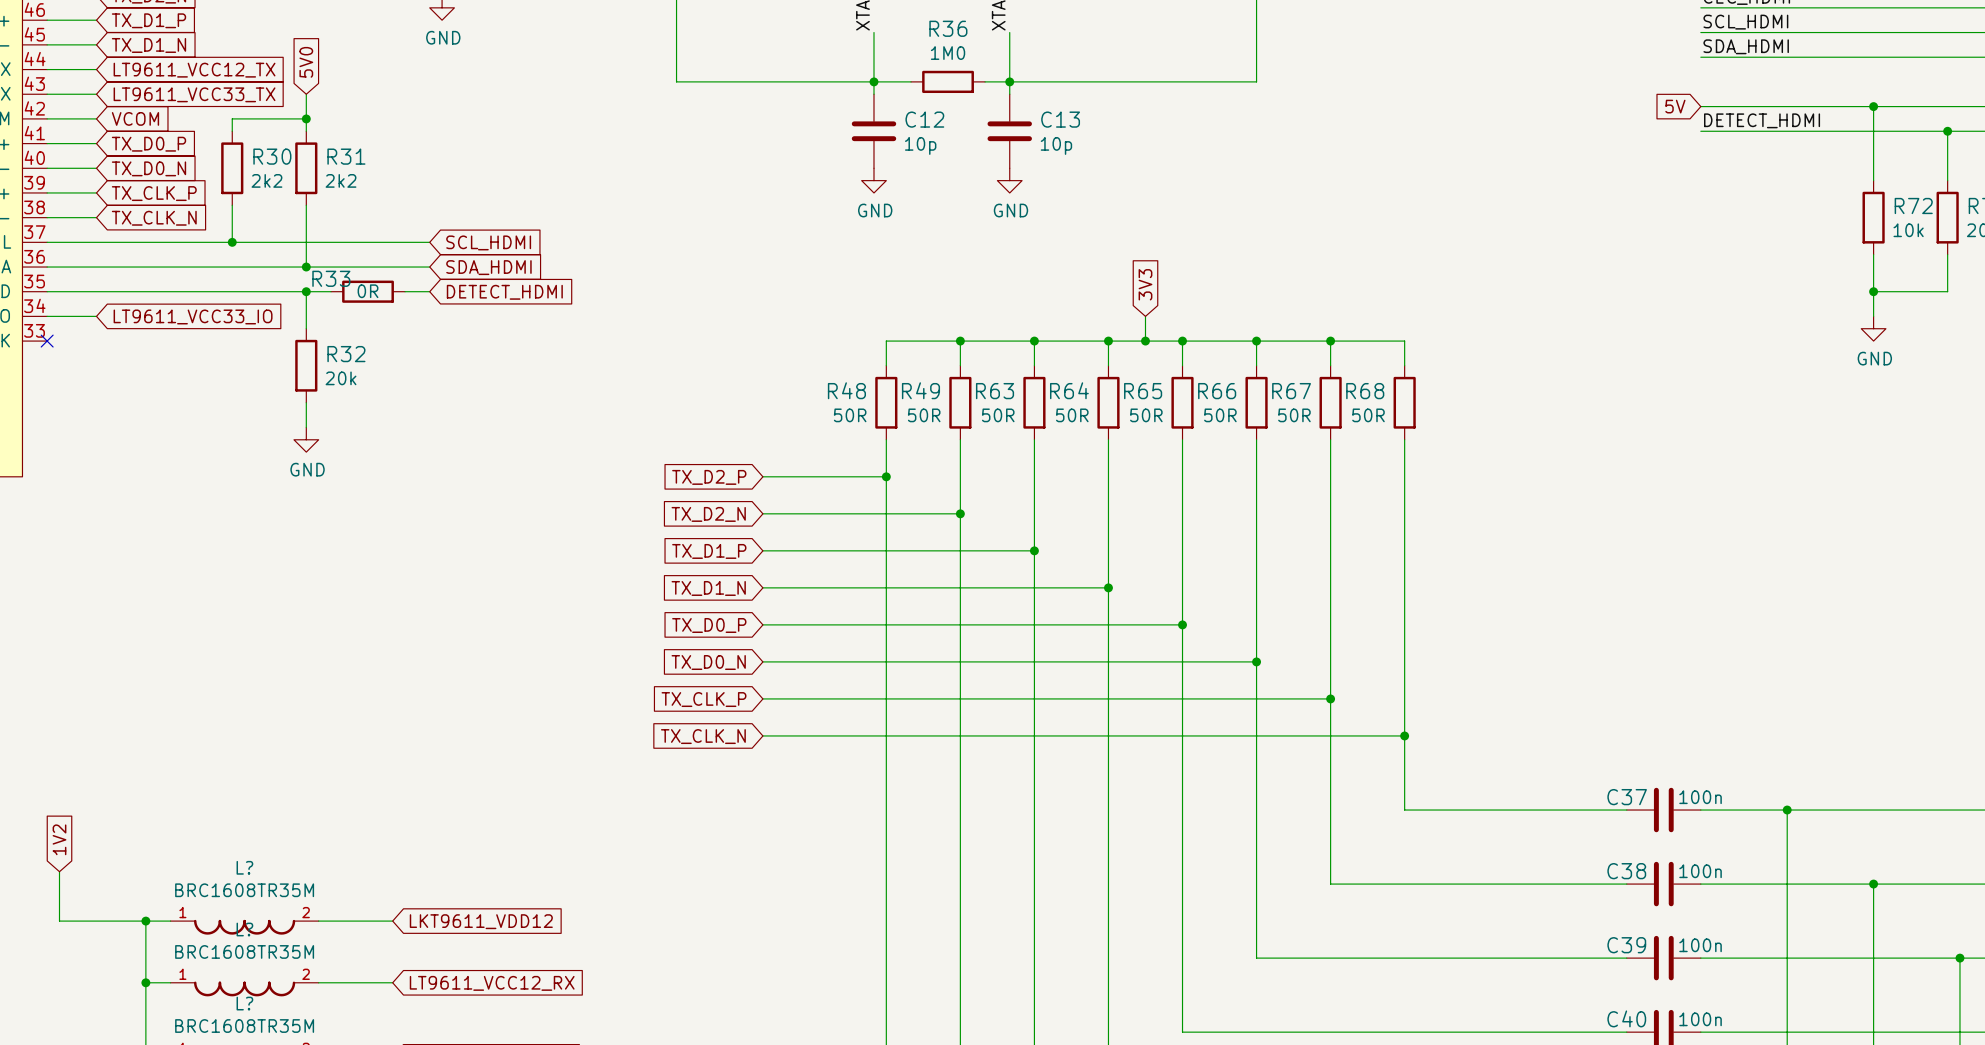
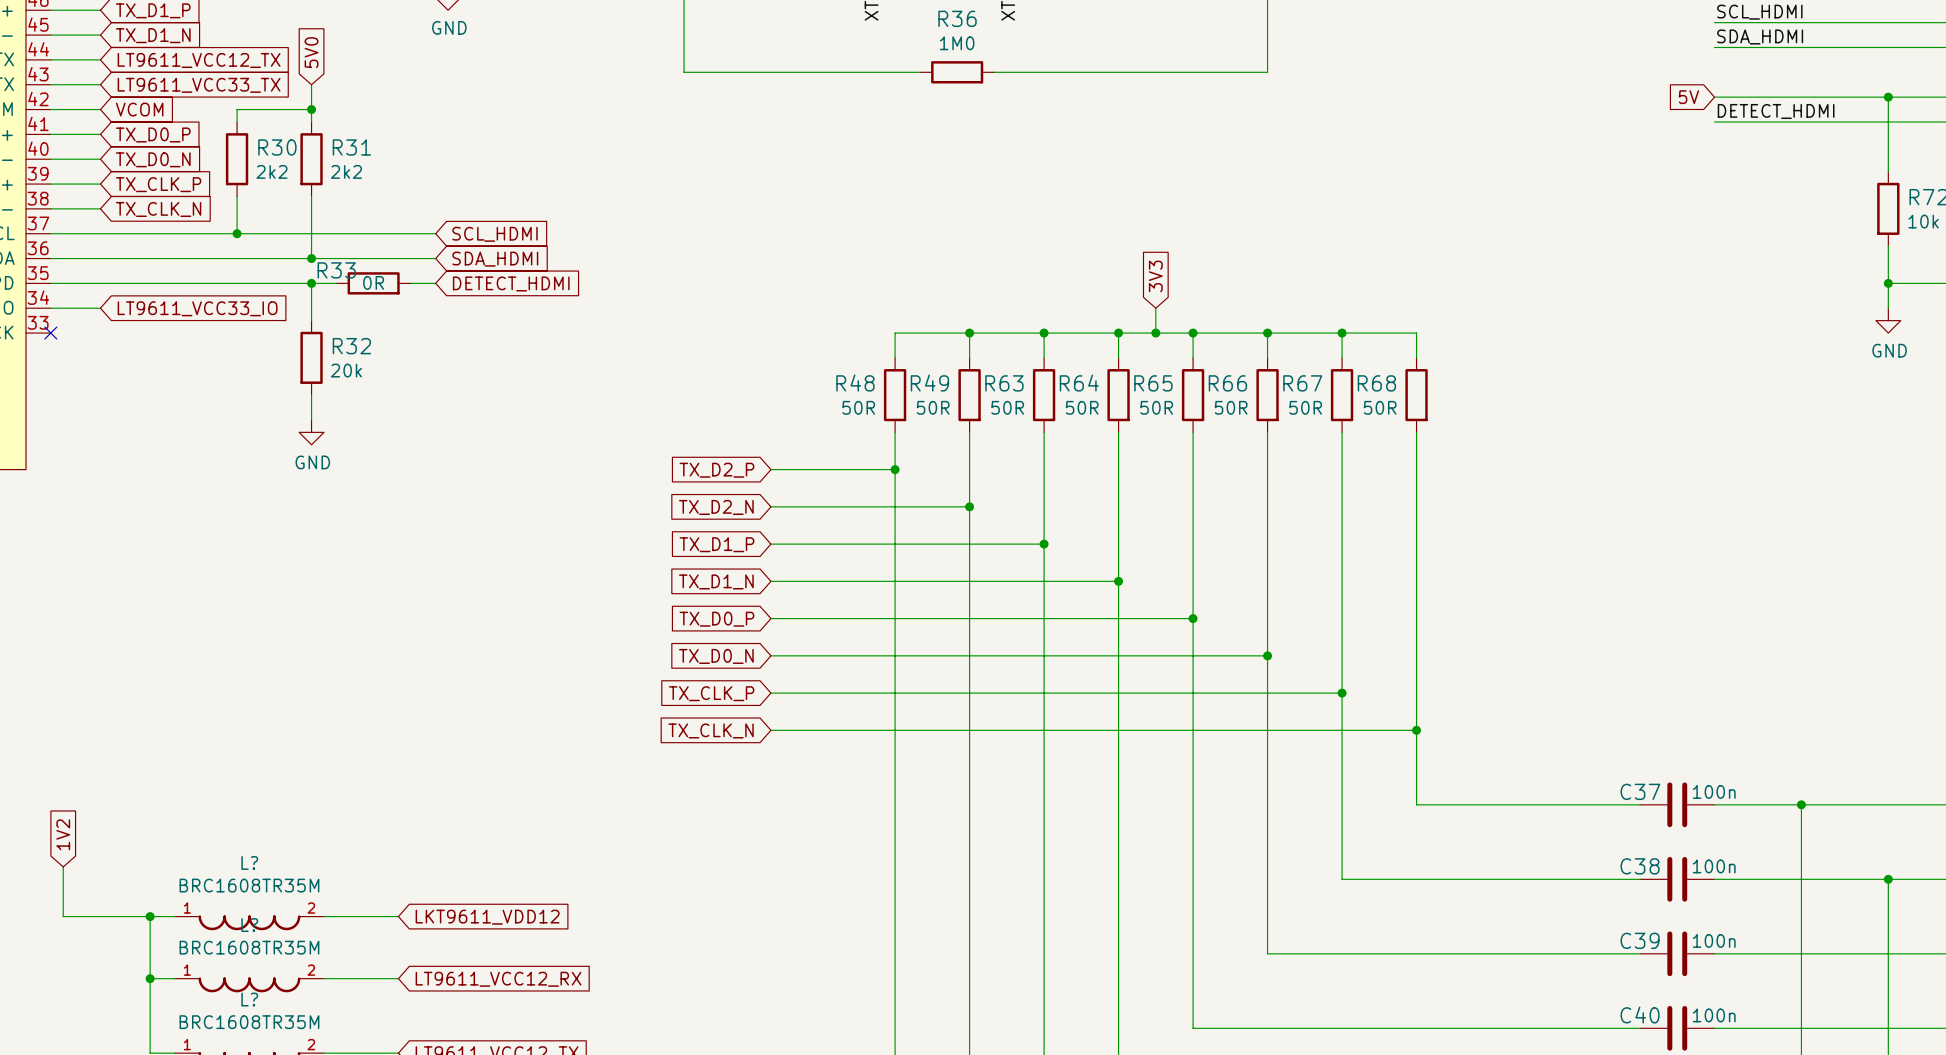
wire: (873, 32) (873, 94) -> none
wire: (1009, 32) (1009, 94) -> none
junction: (873, 81) -> none
junction: (1009, 81) -> none
C12: (873, 131) -> none
C13: (1009, 131) -> none
power symbol: GND (873, 180) -> none
power symbol: GND (1009, 180) -> none

